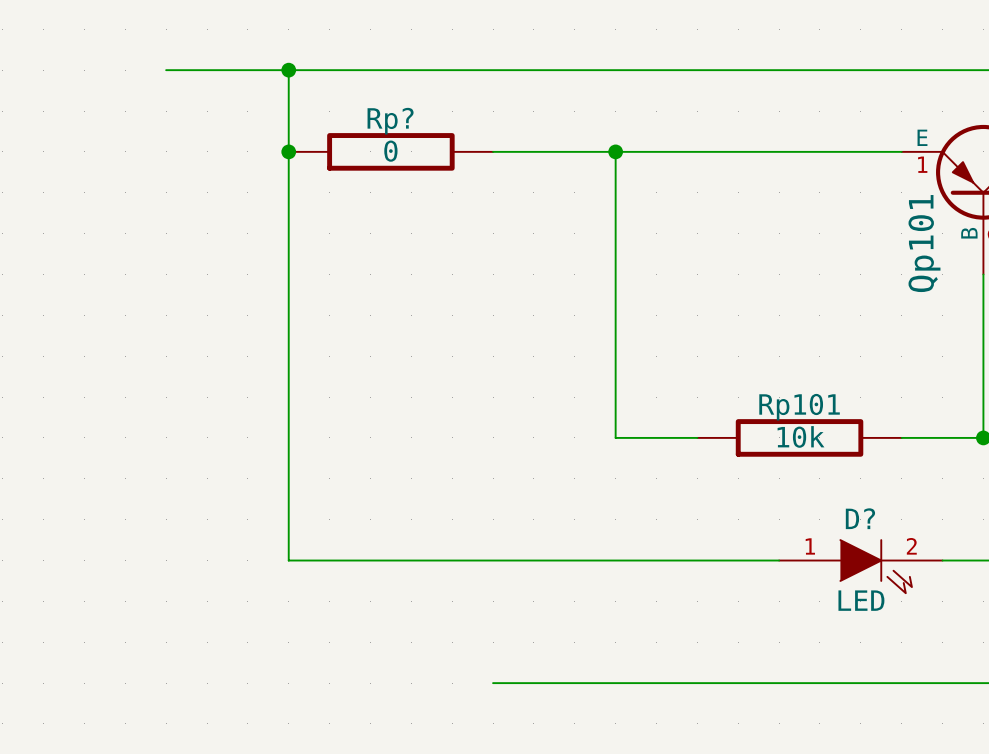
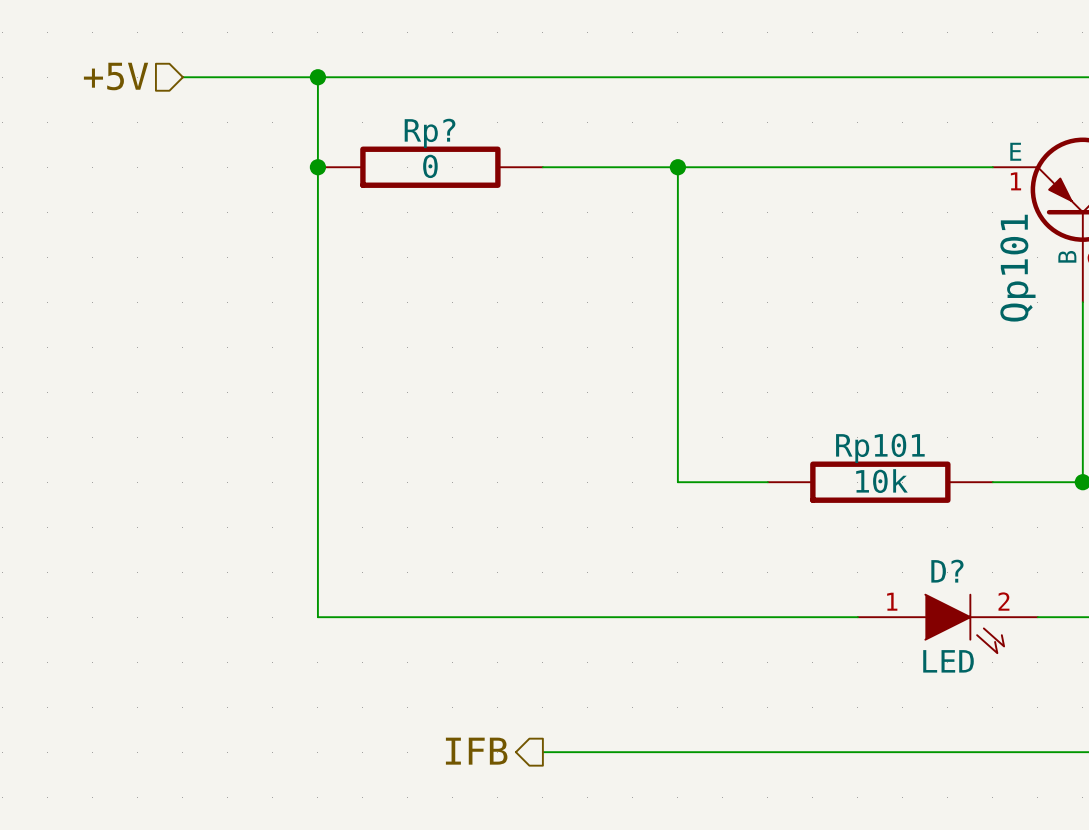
hierarchical label: none -> +5V (116, 76)
hierarchical label: none -> IFB (476, 751)

